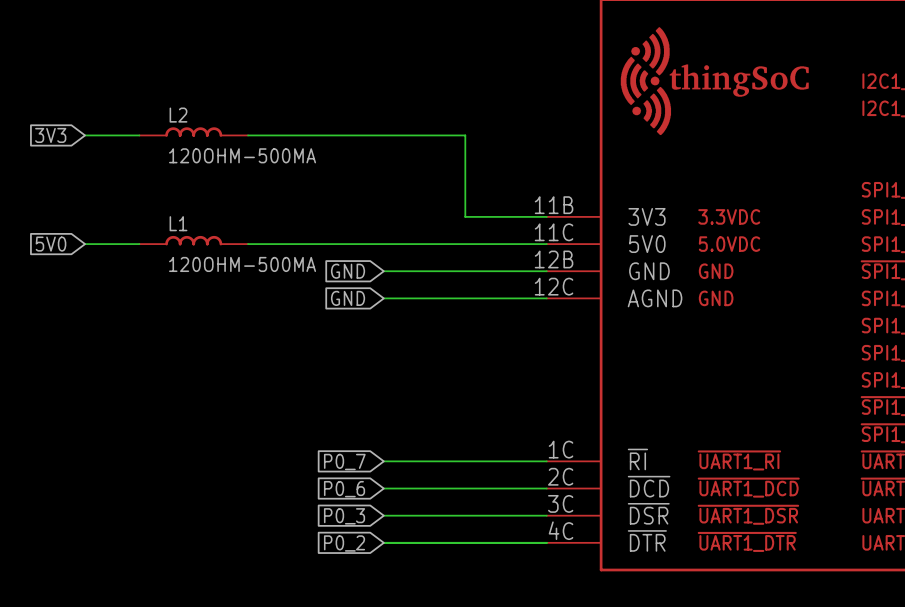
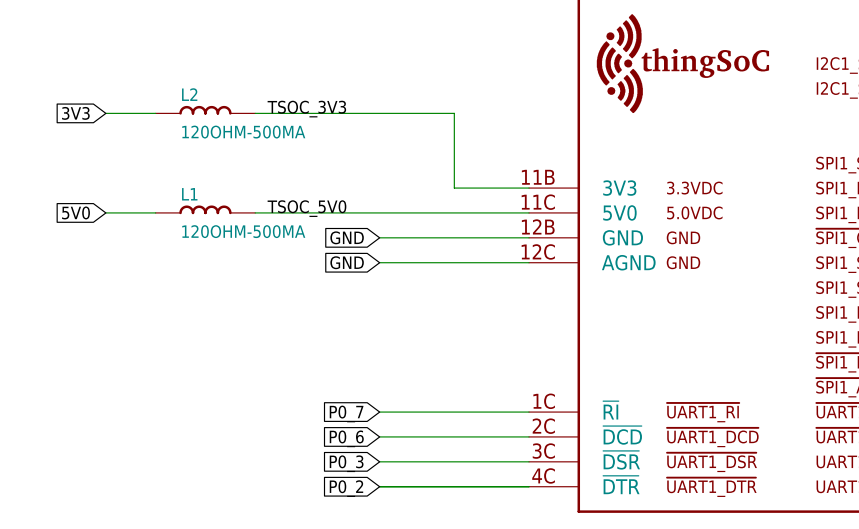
label: none -> TSOC_3V3 (306, 109)
label: none -> TSOC_5V0 (306, 208)

